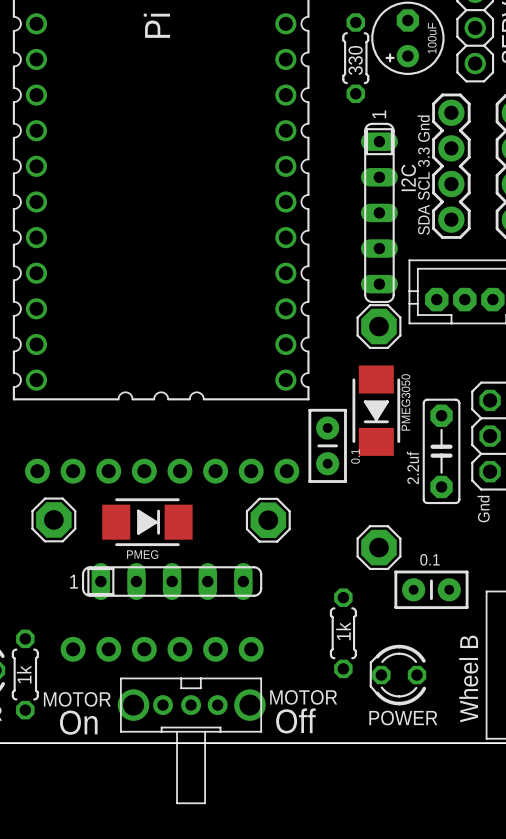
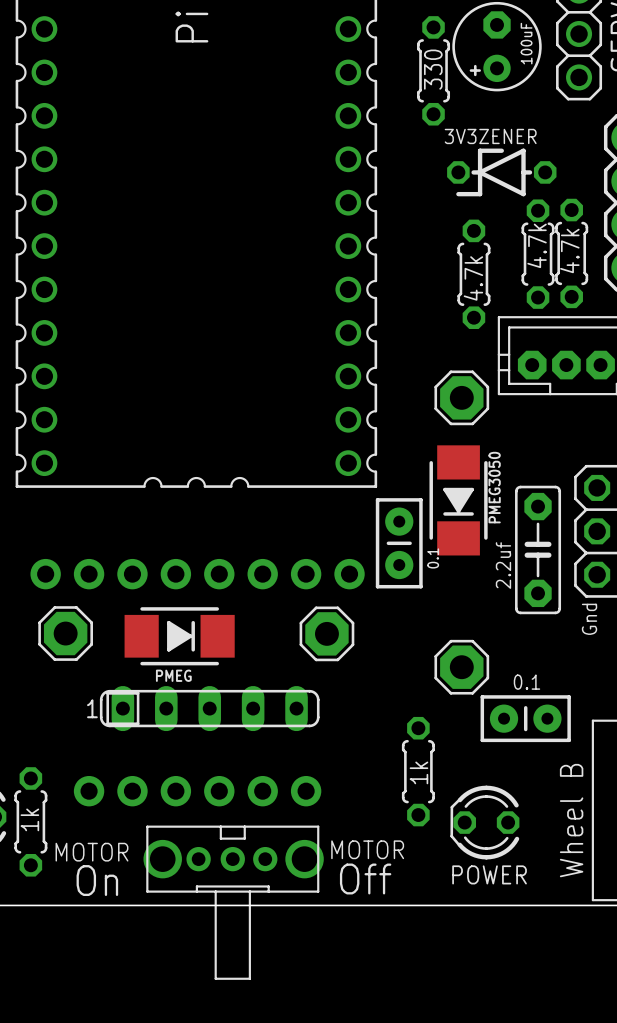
3V3ZENER: none -> (501, 172)
I2C: (451, 166) -> none
text: SDA SCL 3.3 Gnd (423, 175) -> none
part: none -> 4.7k (538, 254)
part: none -> 4.7k (571, 253)
part: (379, 212) -> none
part: none -> 4.7k (473, 274)

